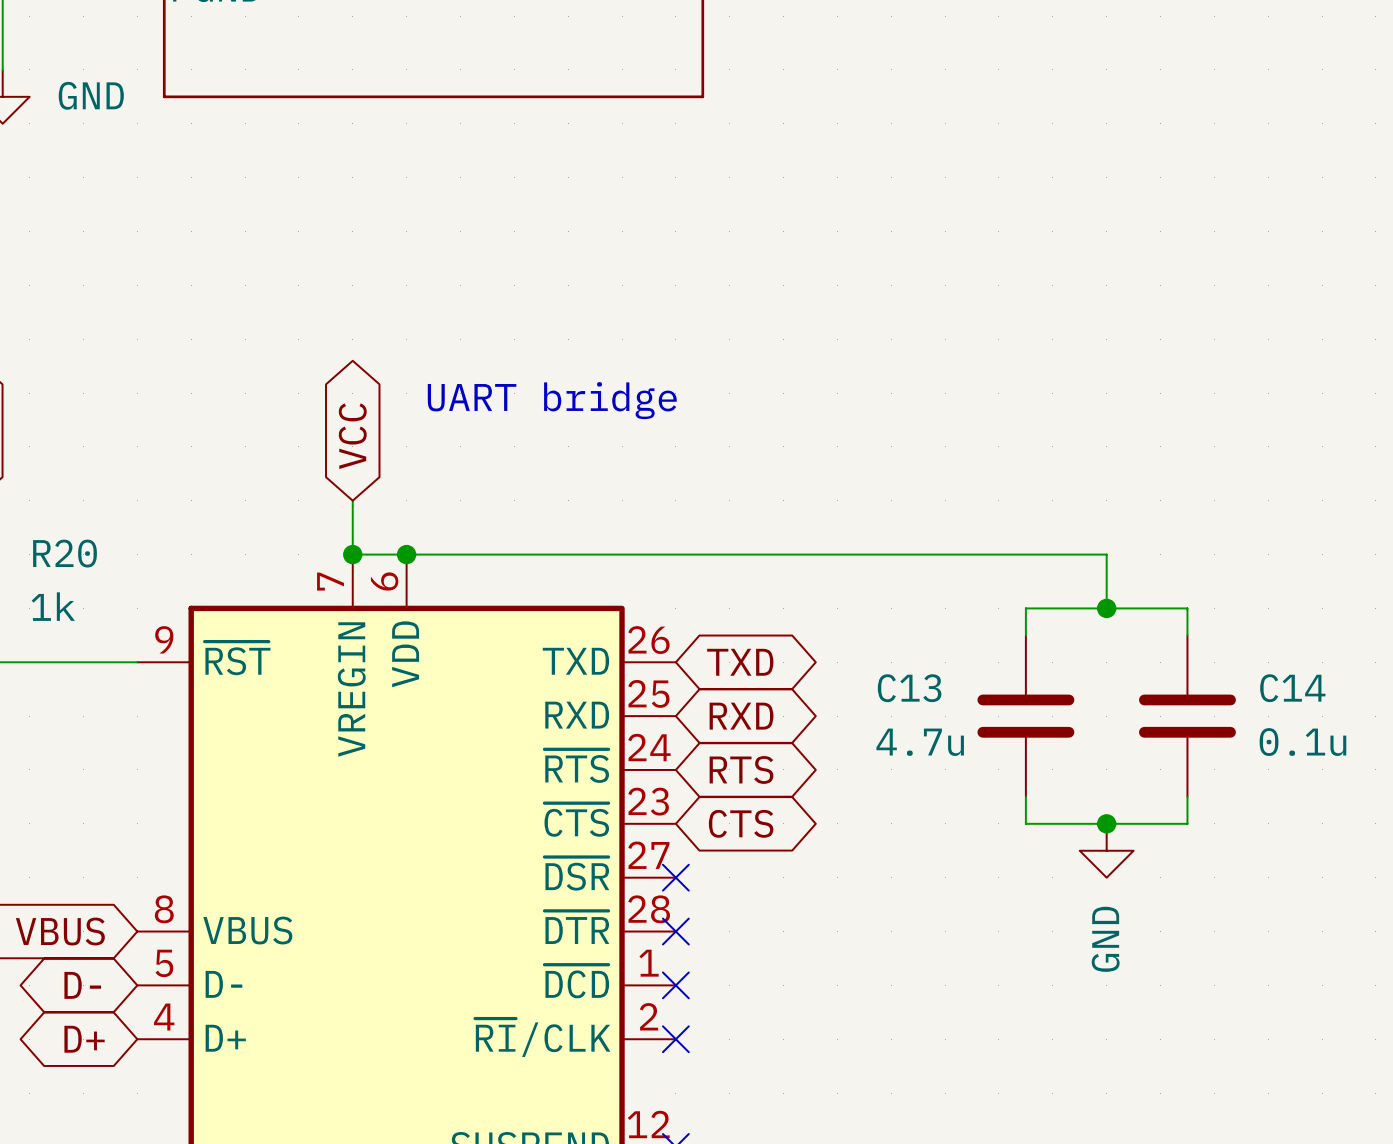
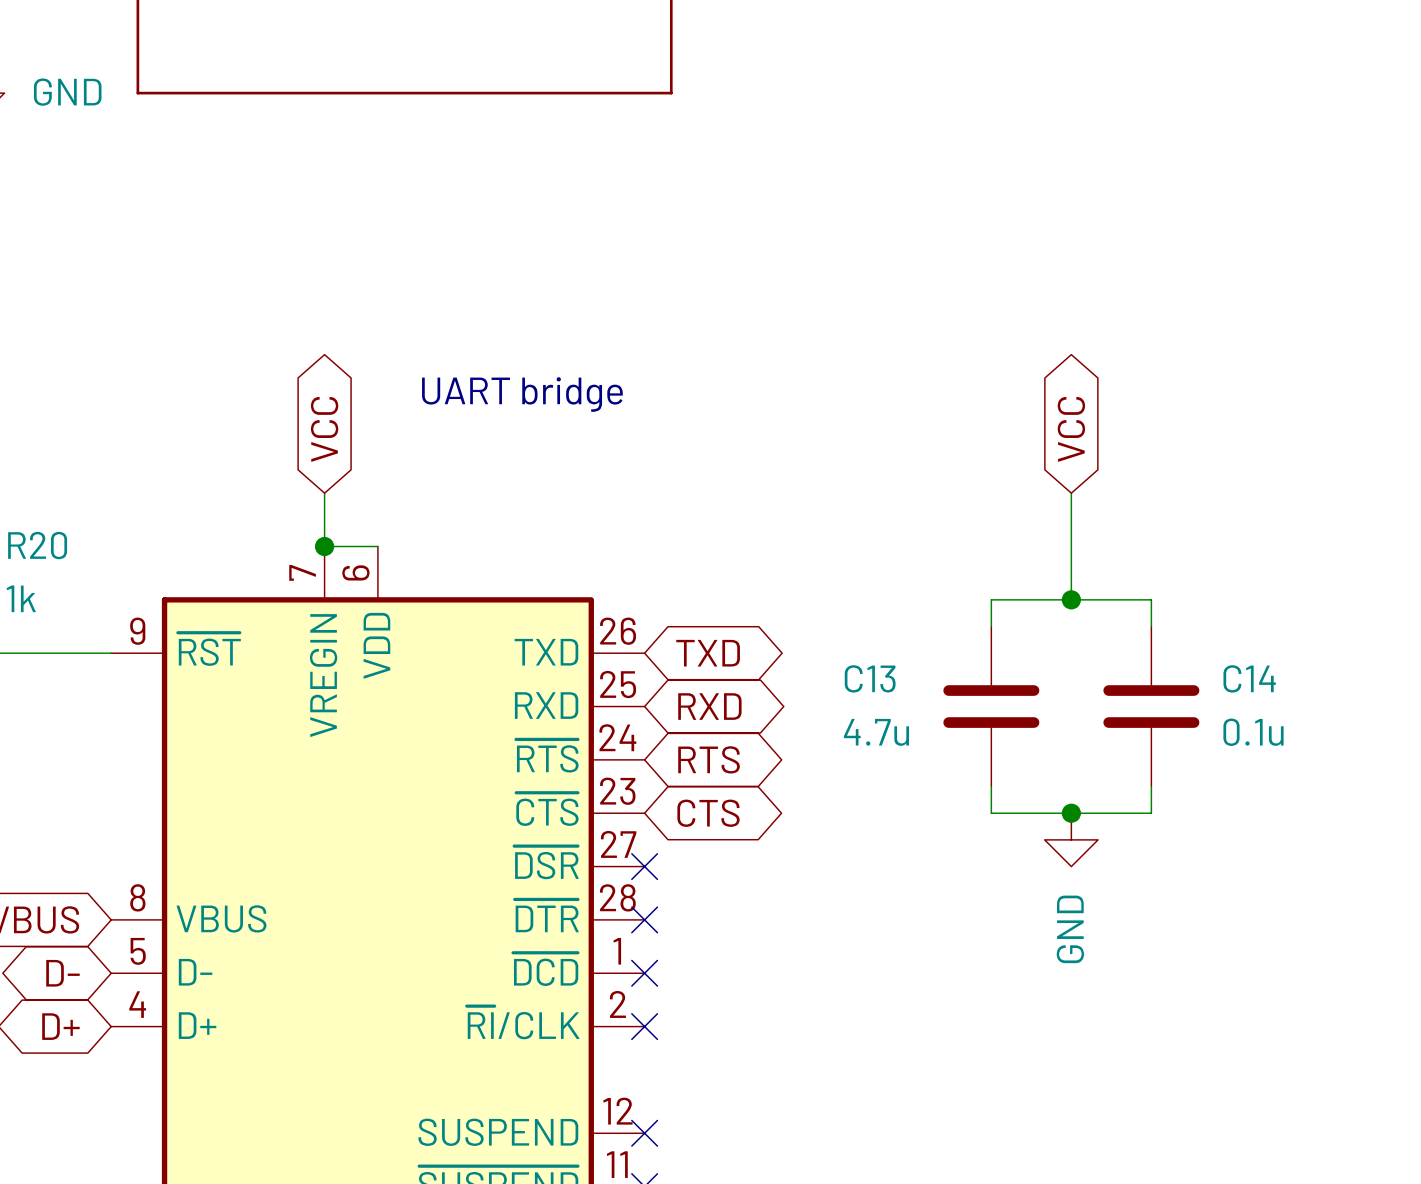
global label: none -> VCC (1071, 429)
wire: (406, 554) (1106, 554) -> (1071, 493) (1071, 546)
junction: (406, 554) -> none

